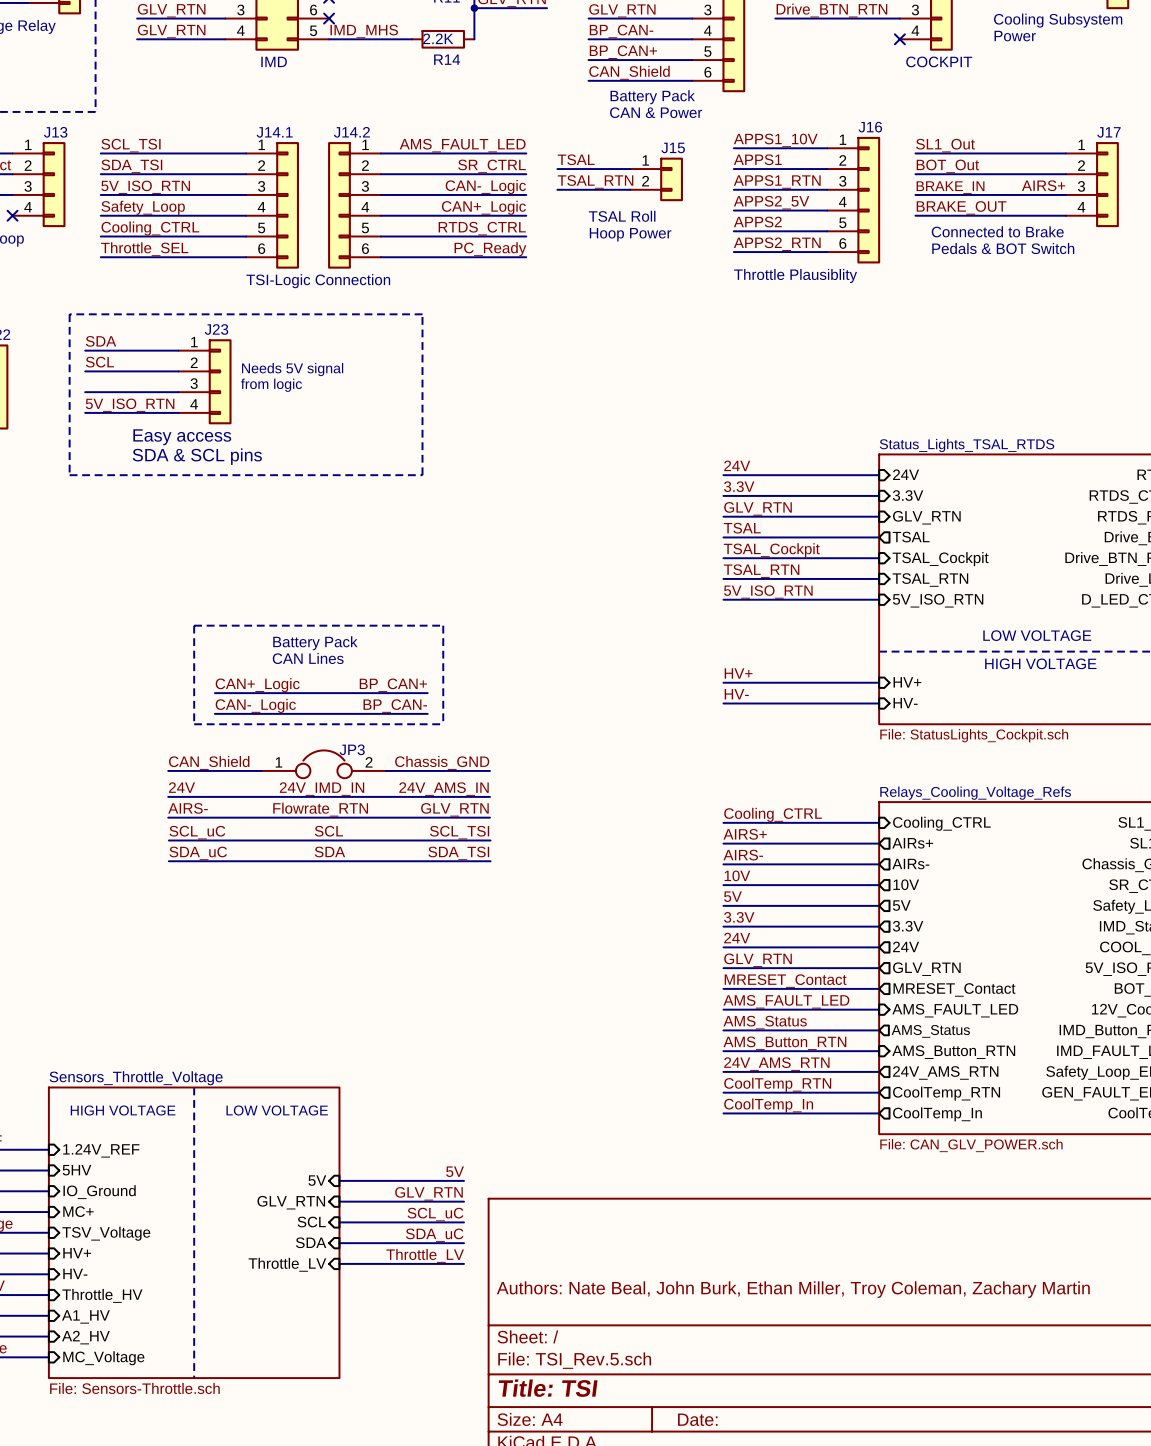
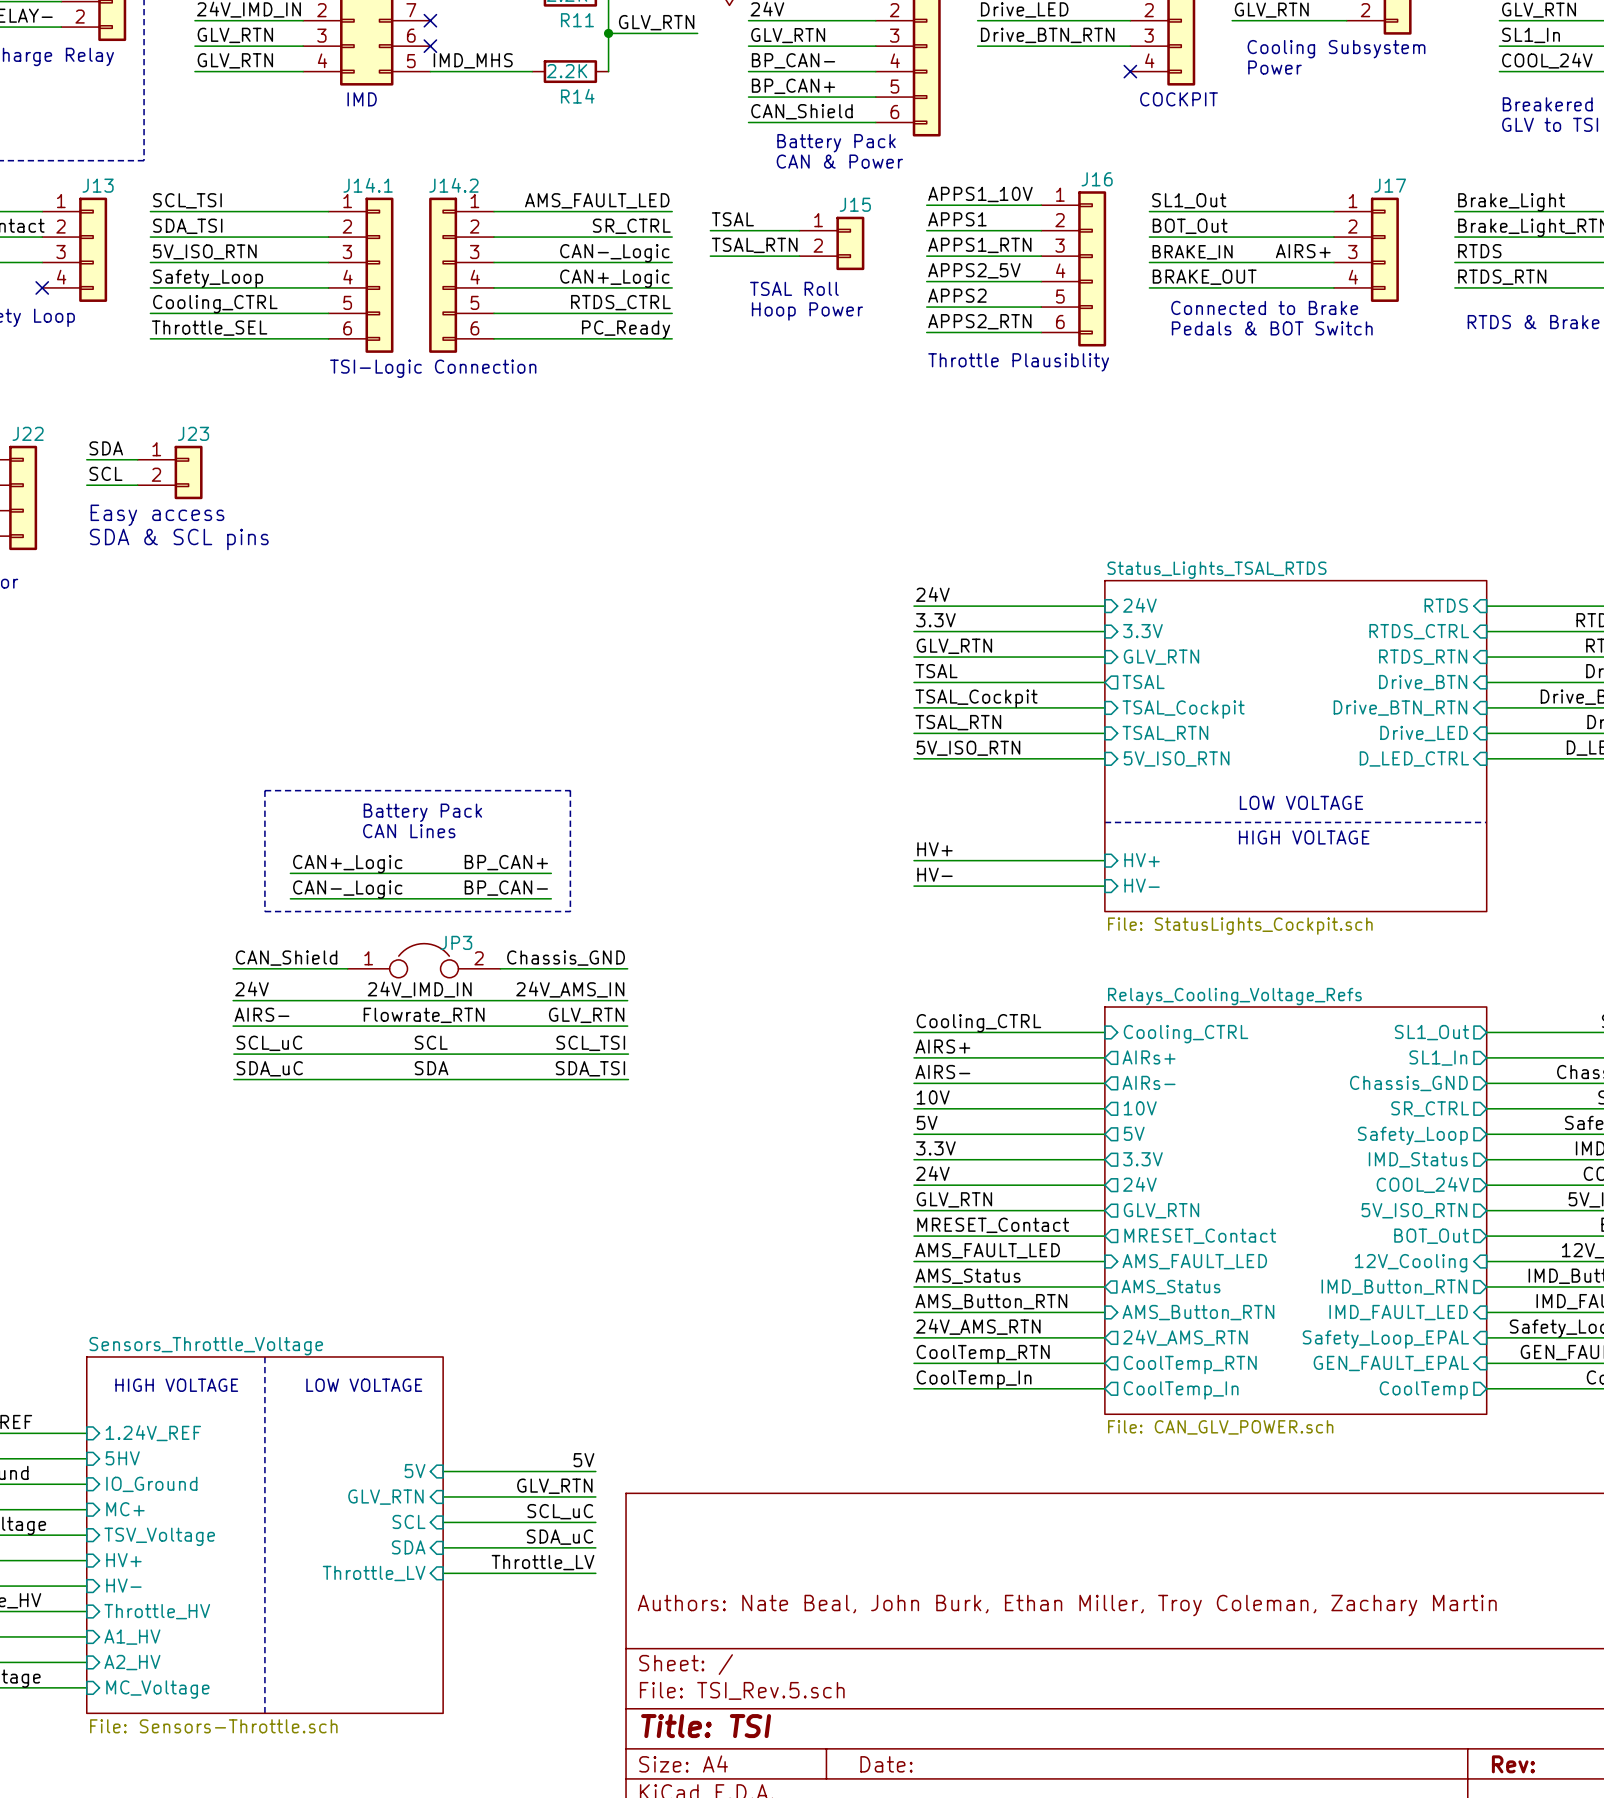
line: (69, 314) (422, 314) (422, 475) (69, 475) (69, 314) -> none
J23 name position: J23 (216, 329) -> J23 (193, 433)
J23 symbol: [178, 339, 232, 425] -> [137, 445, 203, 500]
label position: SDA (101, 341) -> SDA (106, 448)
wire: (85, 350) (178, 350) -> none
wire: none -> (86, 459) (137, 459)
label position: SCL (99, 362) -> SCL (105, 473)
text: Needs 5V signal (292, 369) -> none
wire: (85, 371) (178, 371) -> none
wire: none -> (86, 485) (137, 485)
text: from logic (271, 385) -> none
wire: (85, 392) (178, 392) -> none
label: 5V_ISO_RTN (130, 405) -> none
wire: (85, 412) (178, 412) -> none
text position: Easy access (182, 437) -> Easy access (157, 515)
text position: SDA & SCL pins (197, 456) -> SDA & SCL pins (179, 539)

